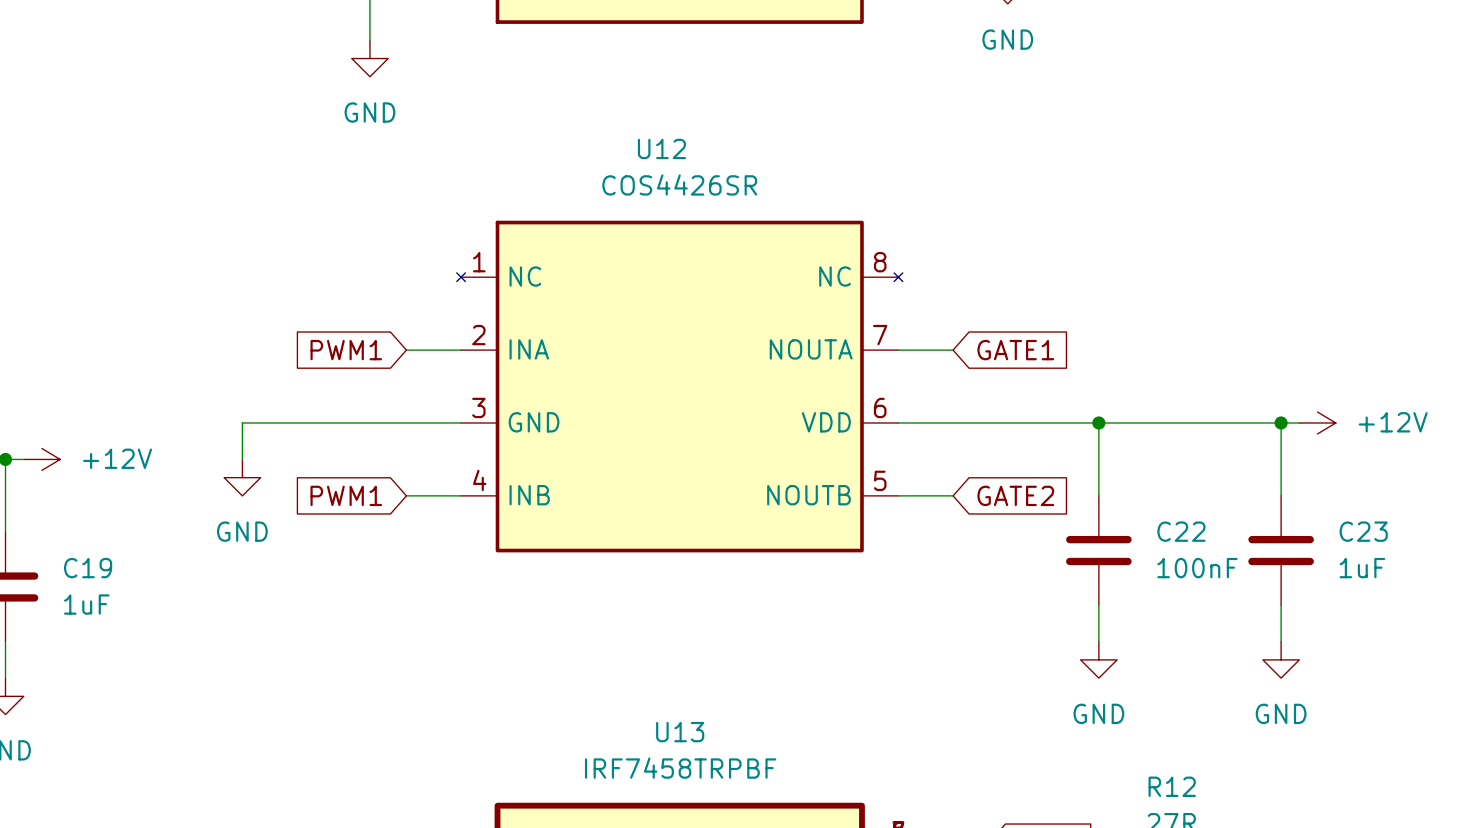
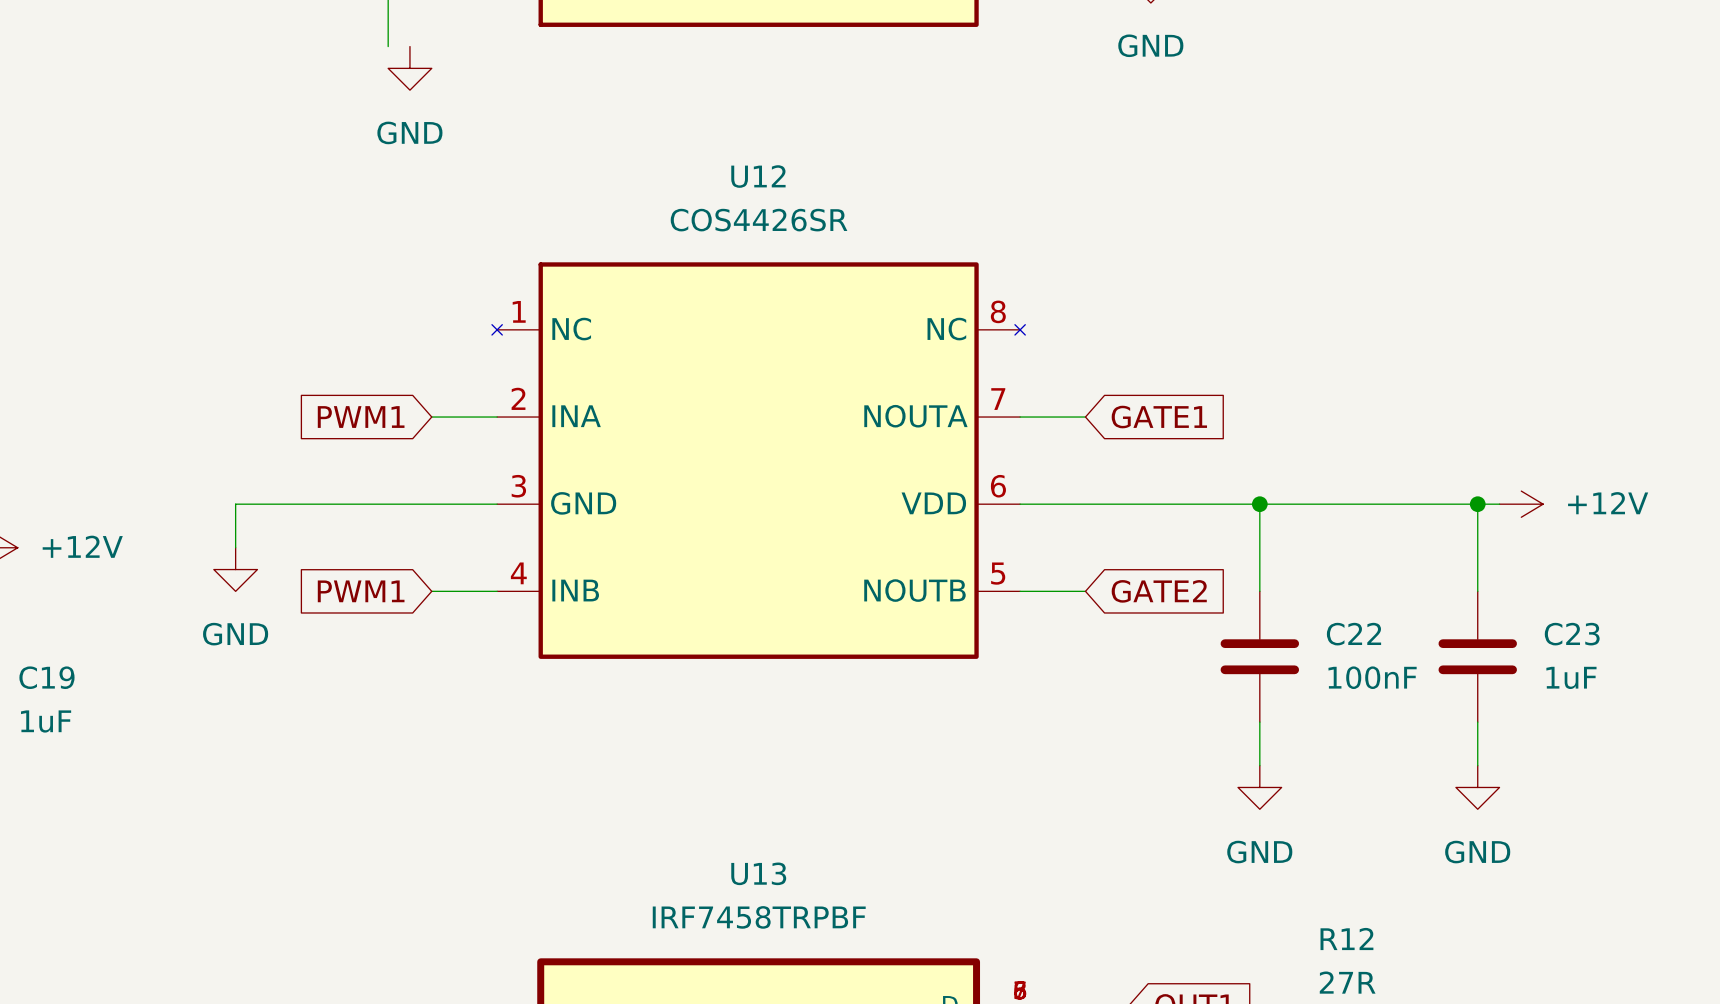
power symbol position: GND (369, 58) -> GND (409, 68)
U12 name position: U12 (661, 148) -> U12 (758, 176)

